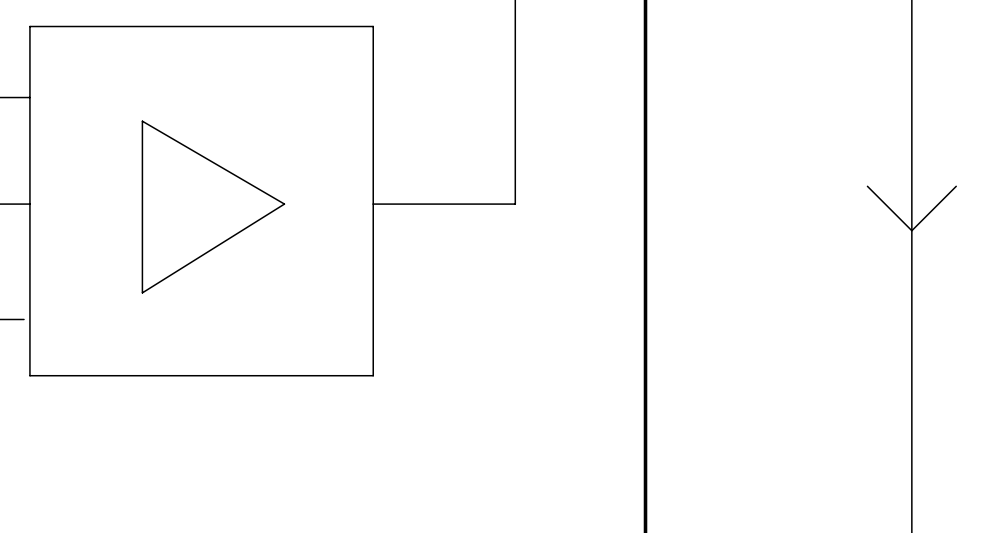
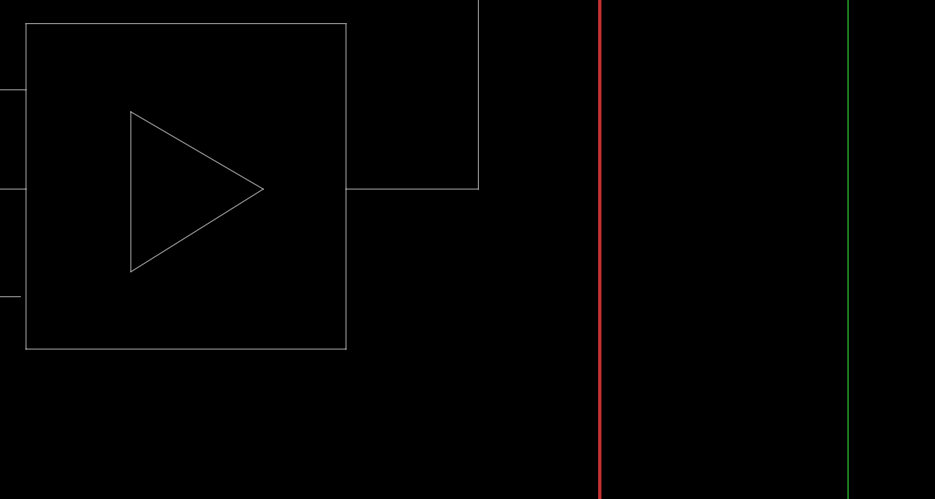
line: (867, 186) (911, 230) (956, 186) -> none

